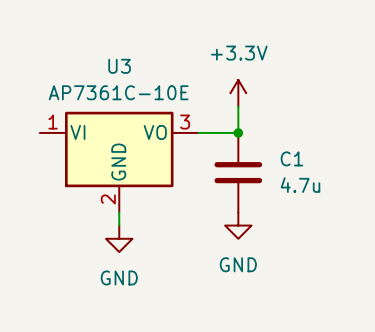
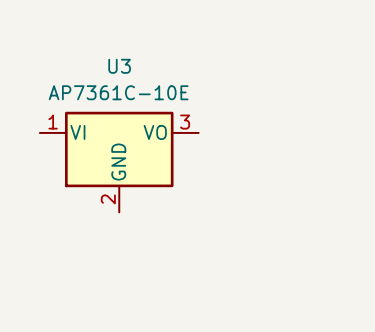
power symbol: +3.3V (238, 93) -> none
wire: (238, 106) (238, 132) (198, 132) -> none
junction: (238, 132) -> none
C1: 4.7u (238, 172) -> none
wire: (119, 212) (119, 225) -> none
power symbol: GND (238, 225) -> none
power symbol: GND (119, 238) -> none

